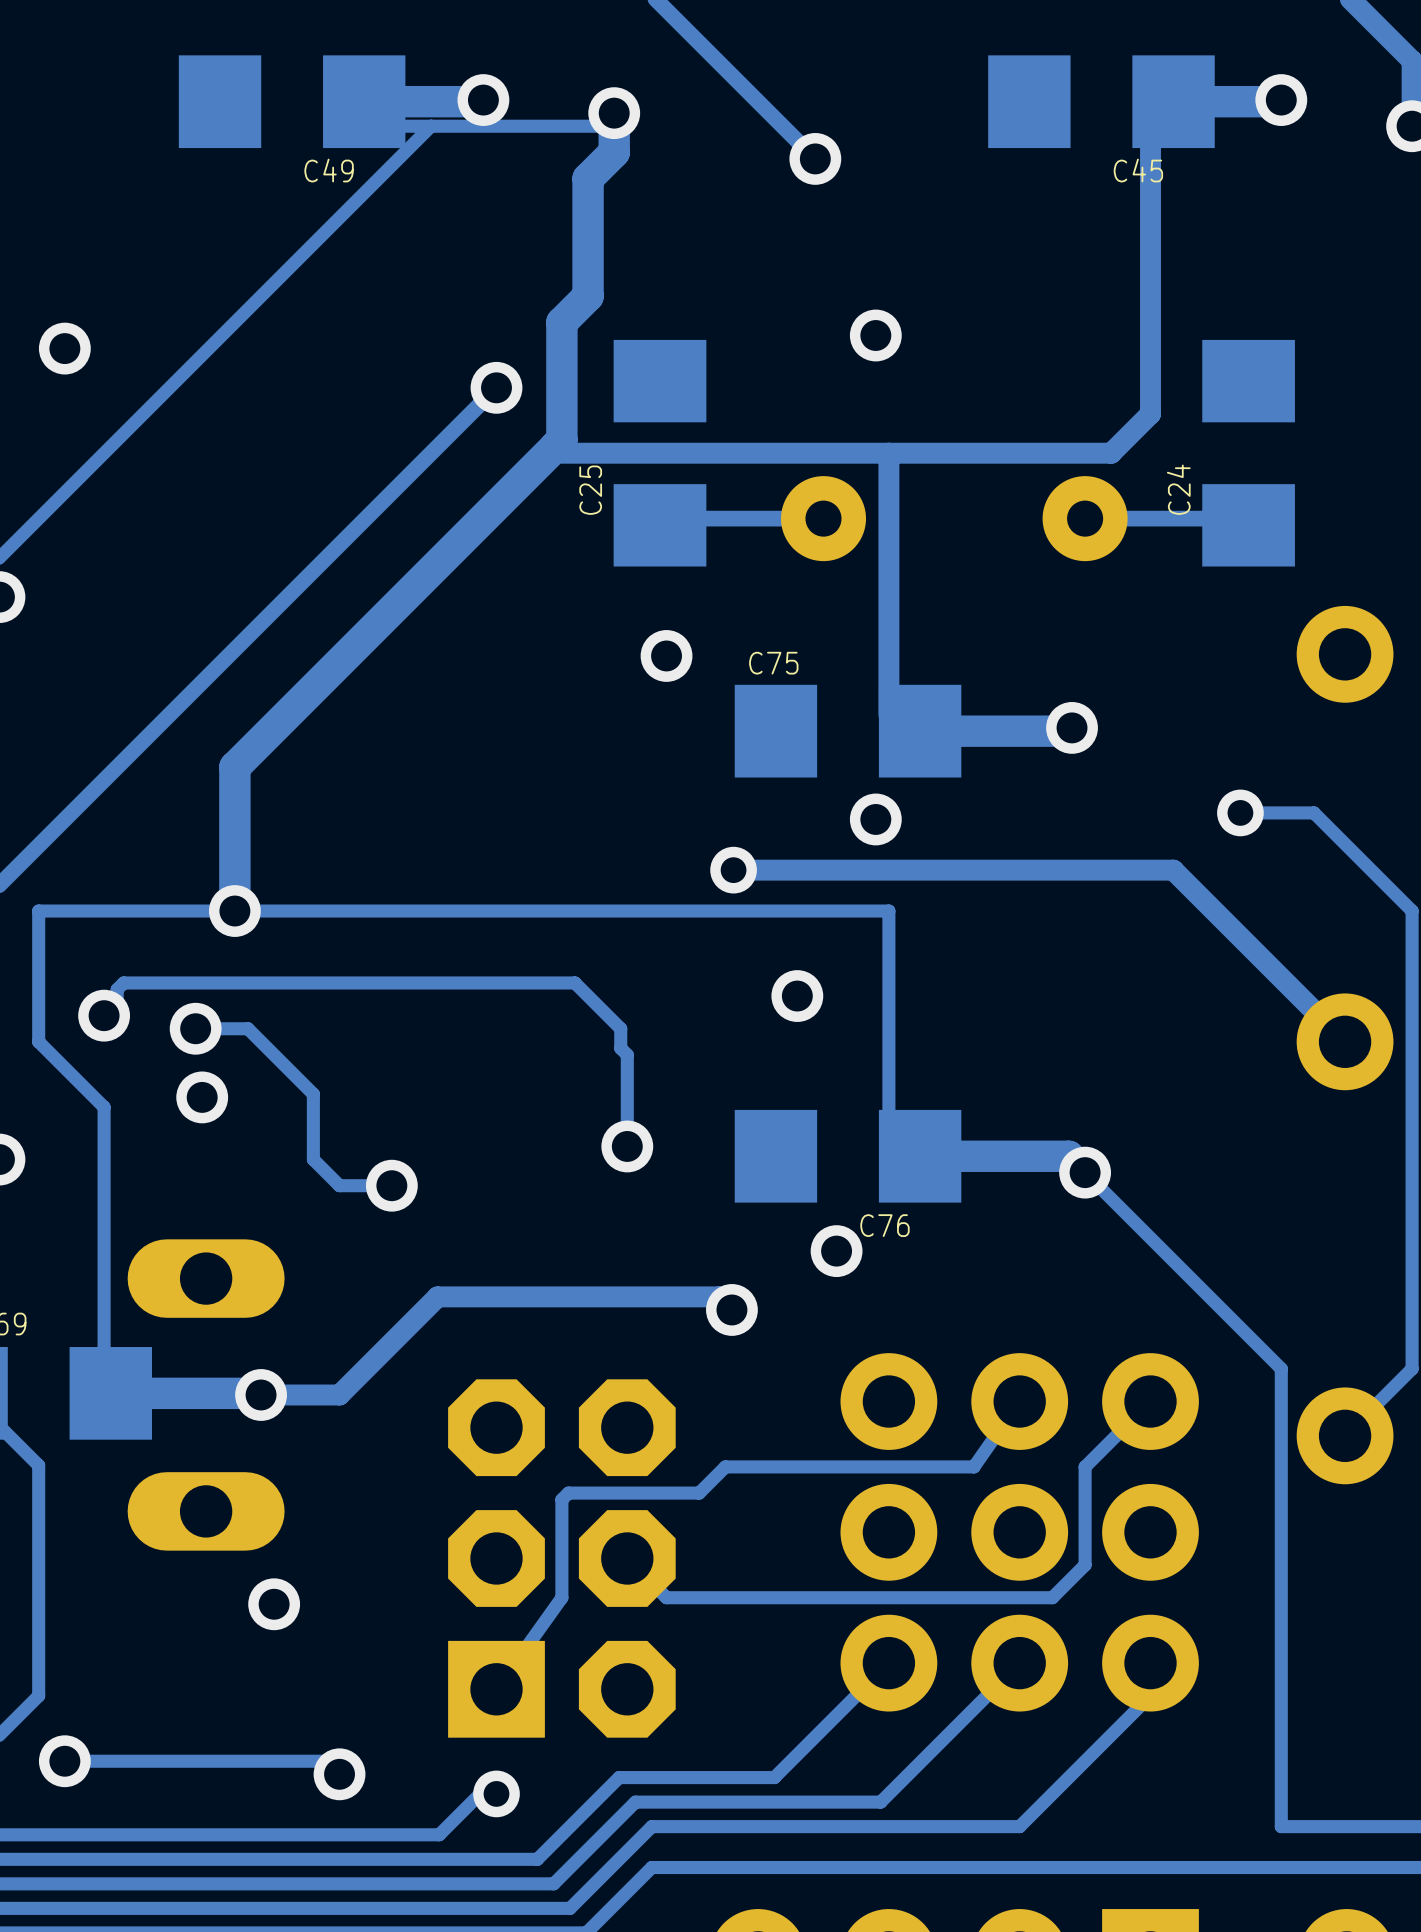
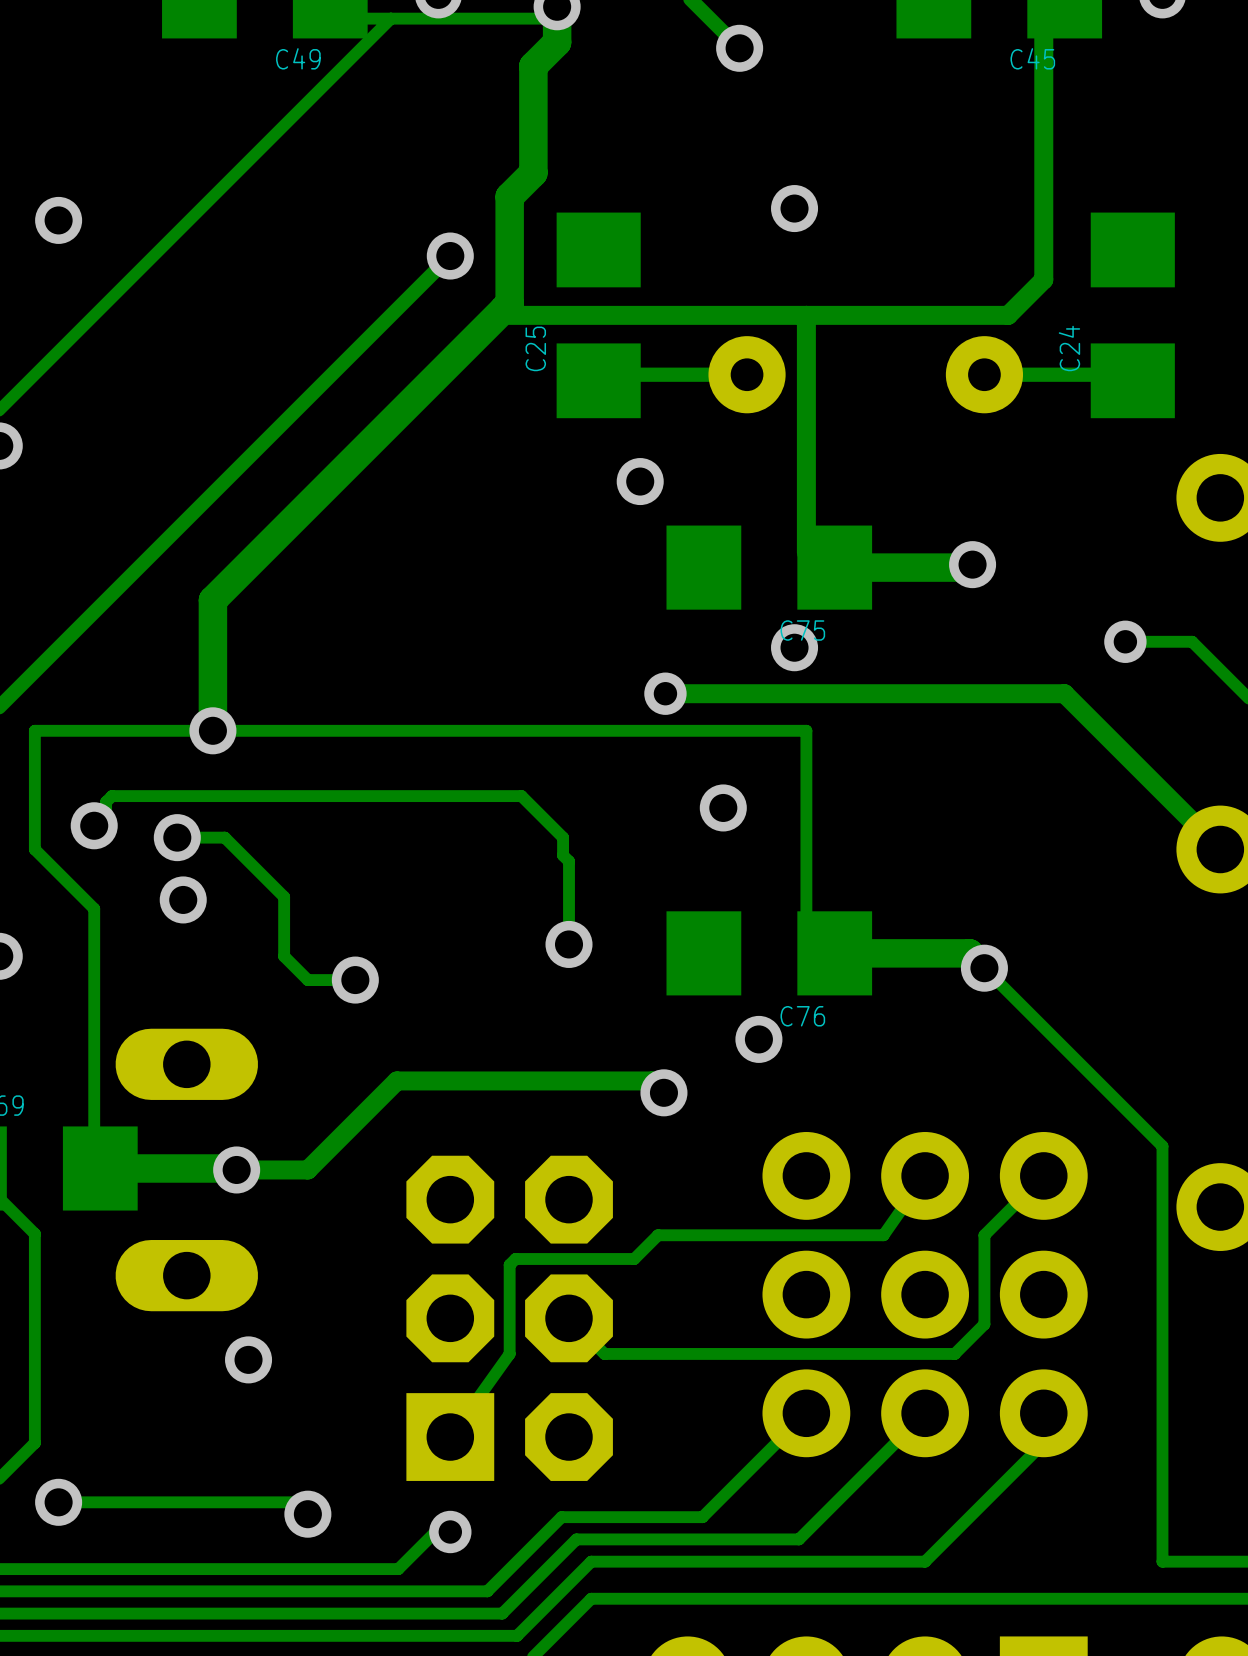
via position: (666, 655) -> (640, 481)
C75 name position: C75 (773, 663) -> C75 (802, 630)

